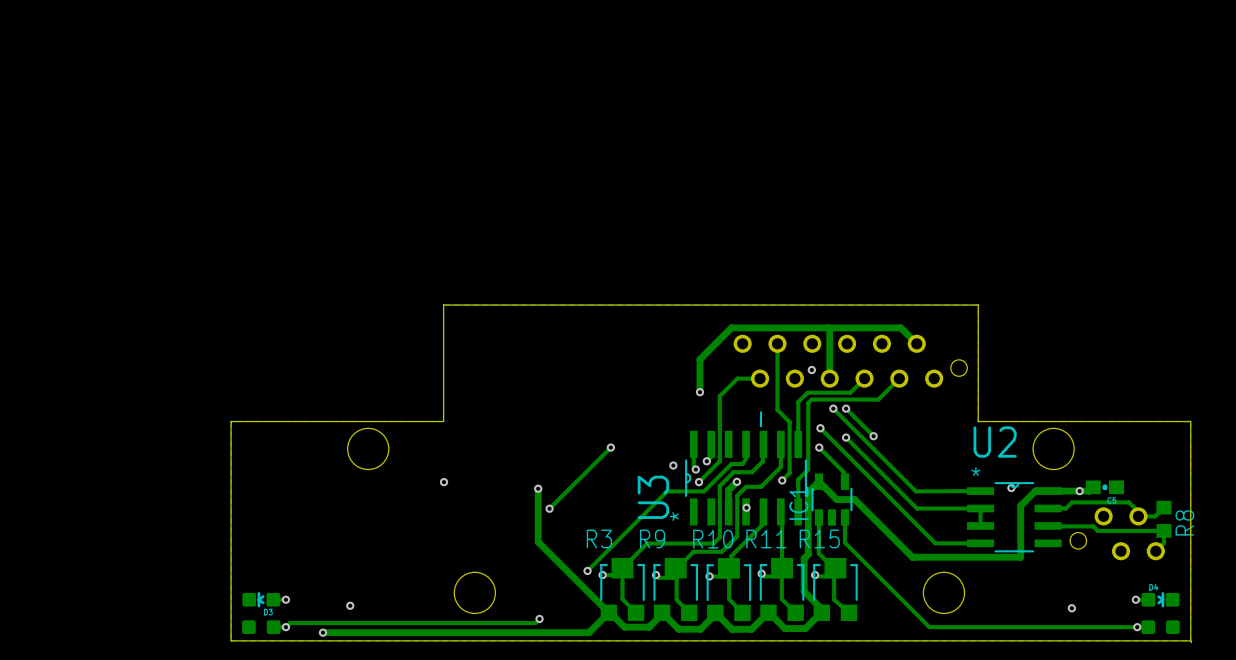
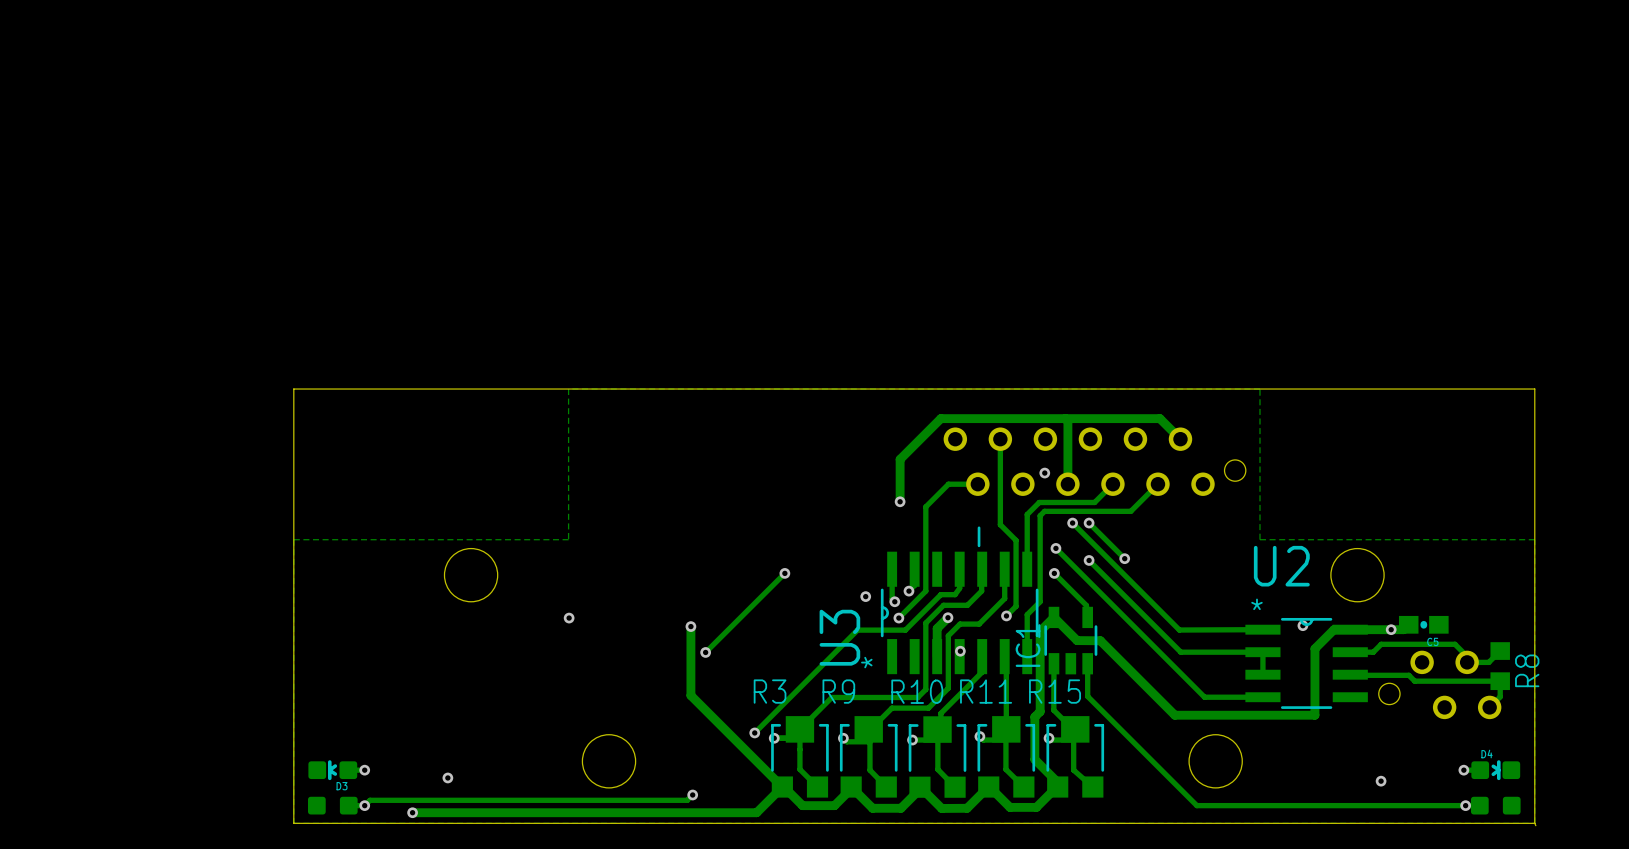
board edge: (443, 305) (443, 421) (231, 421) -> (568, 389) (293, 389) (293, 539)
board edge: (978, 305) (978, 421) (1190, 421) -> (1259, 389) (1534, 389) (1534, 539)

